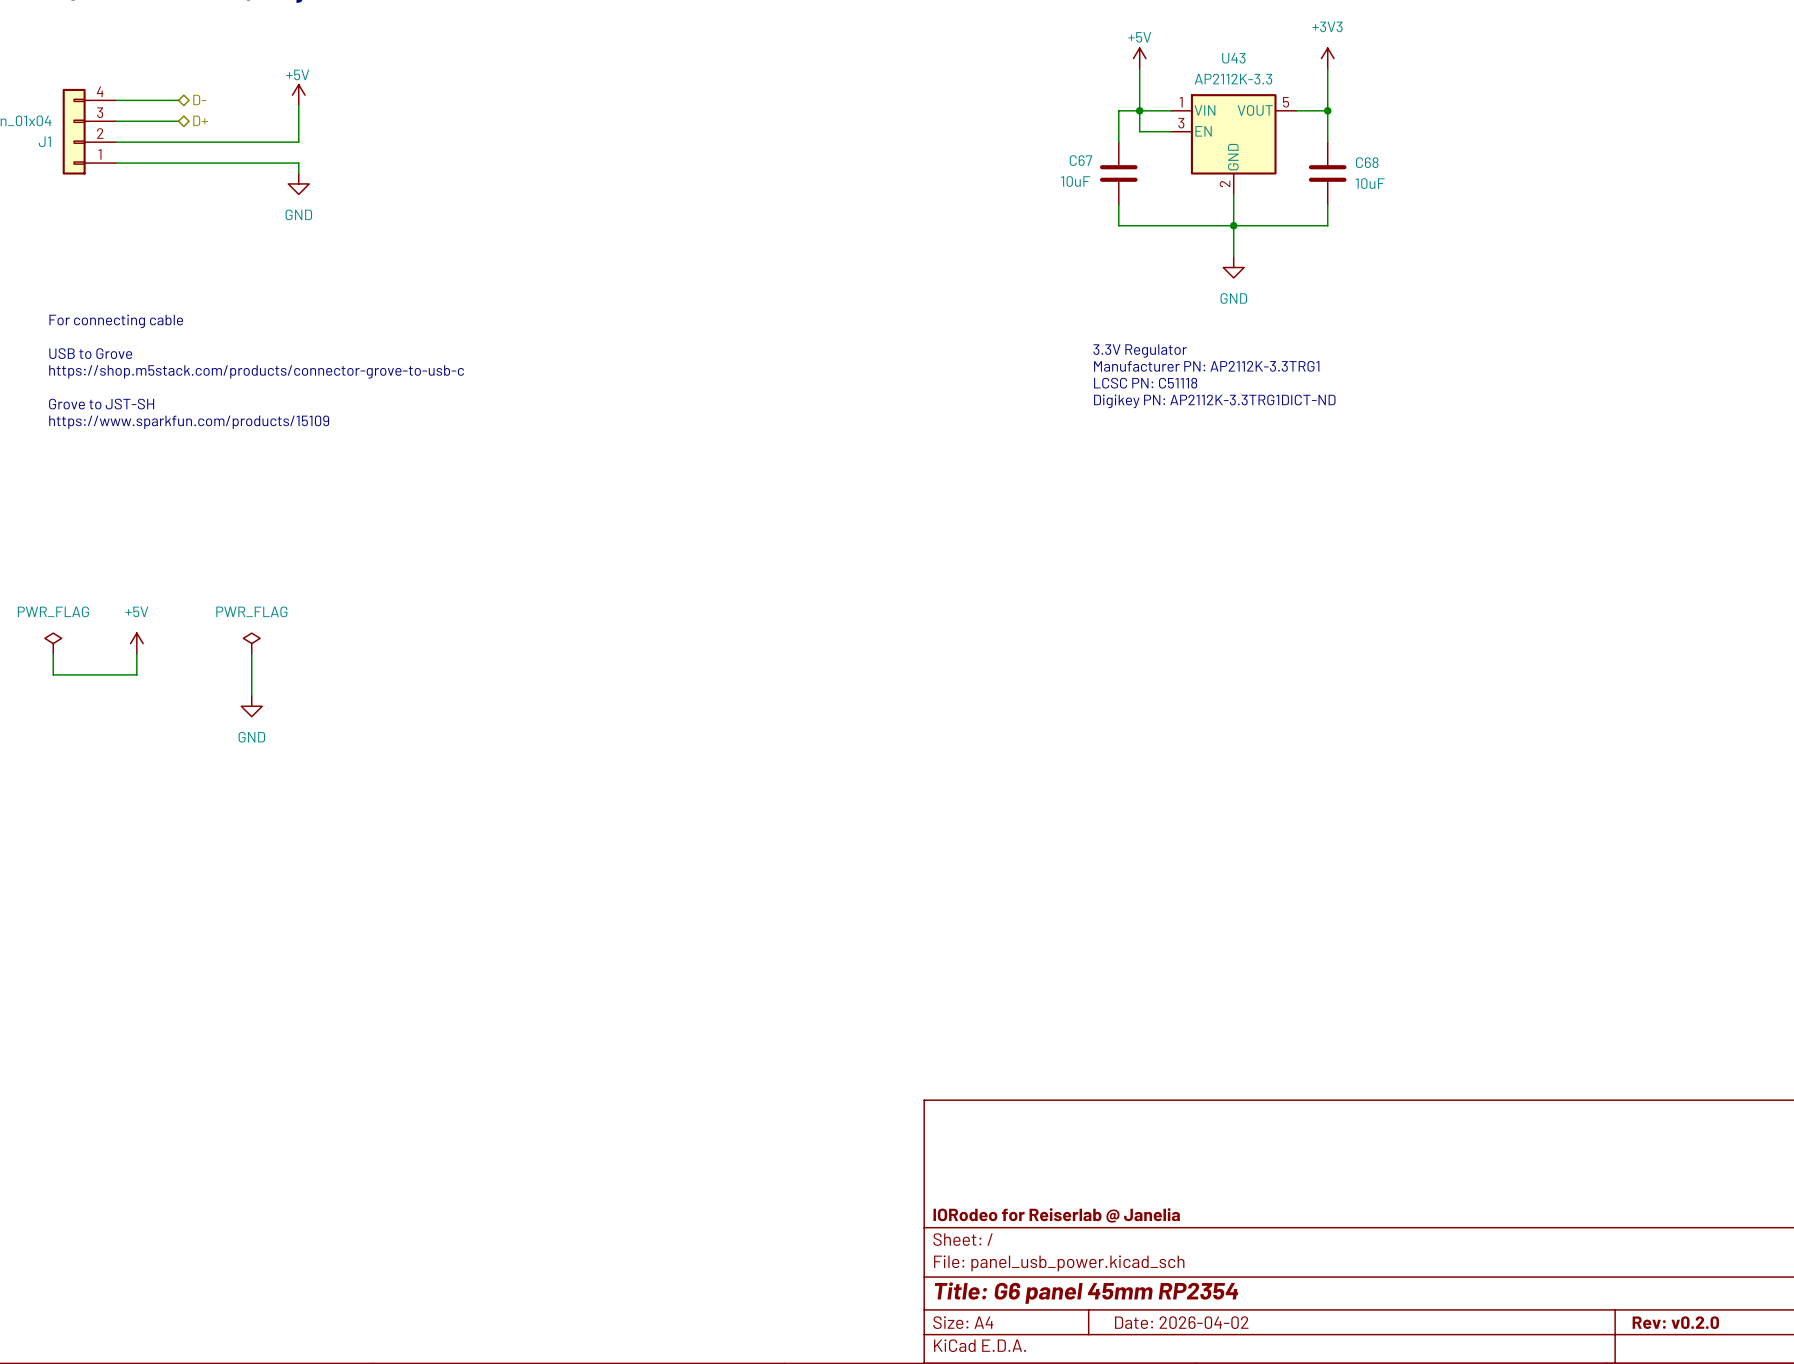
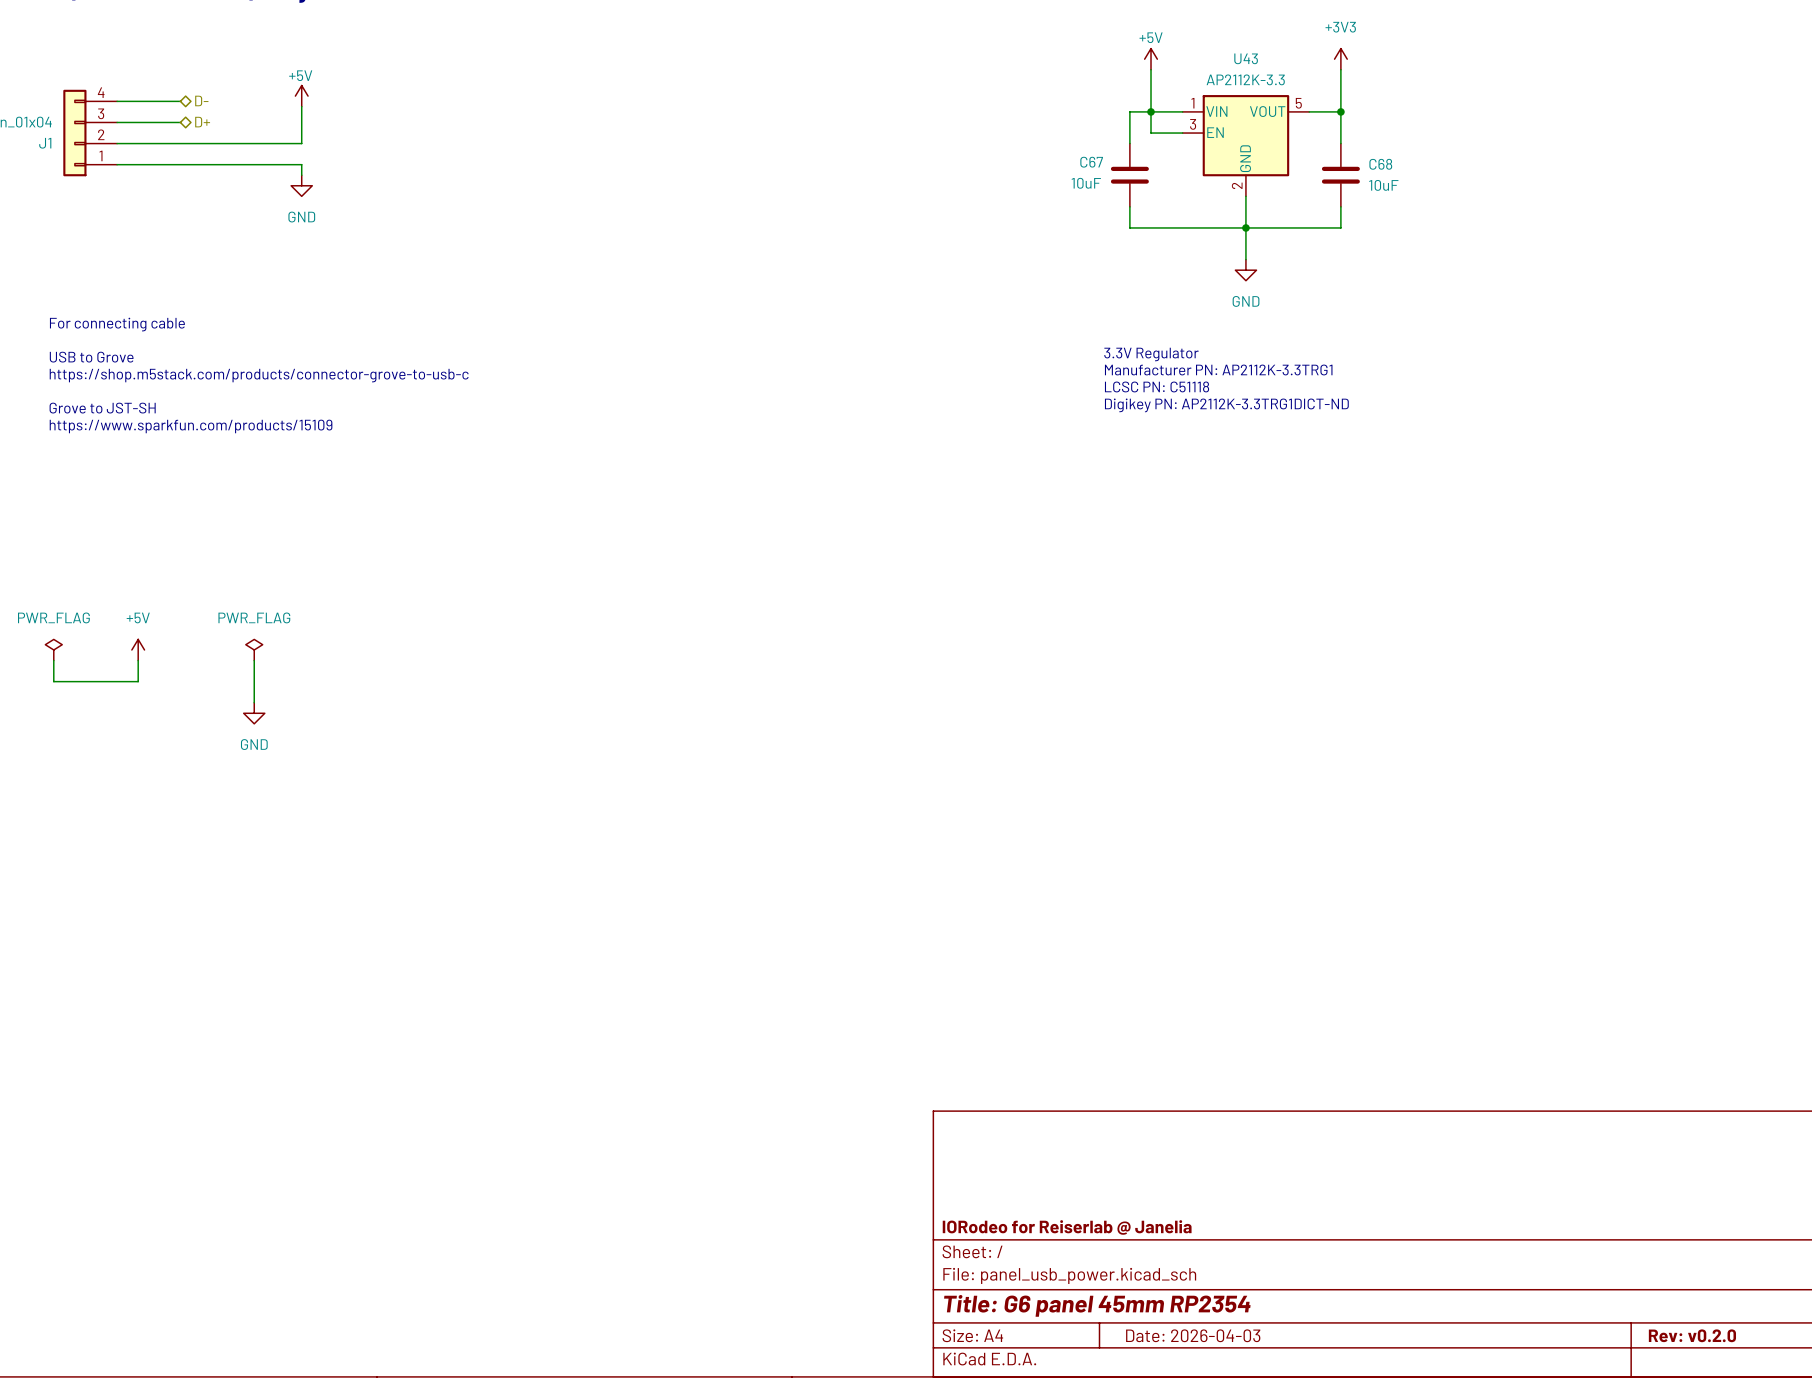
title block: Date: 2026-04-02 (1181, 1322) -> Date: 2026-04-03 (1193, 1335)

